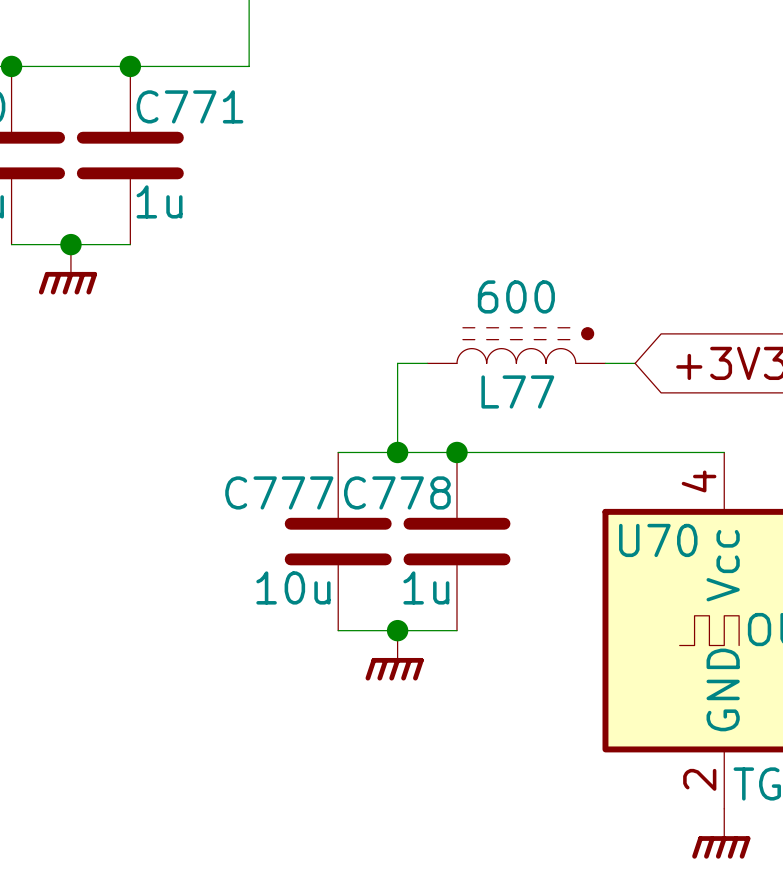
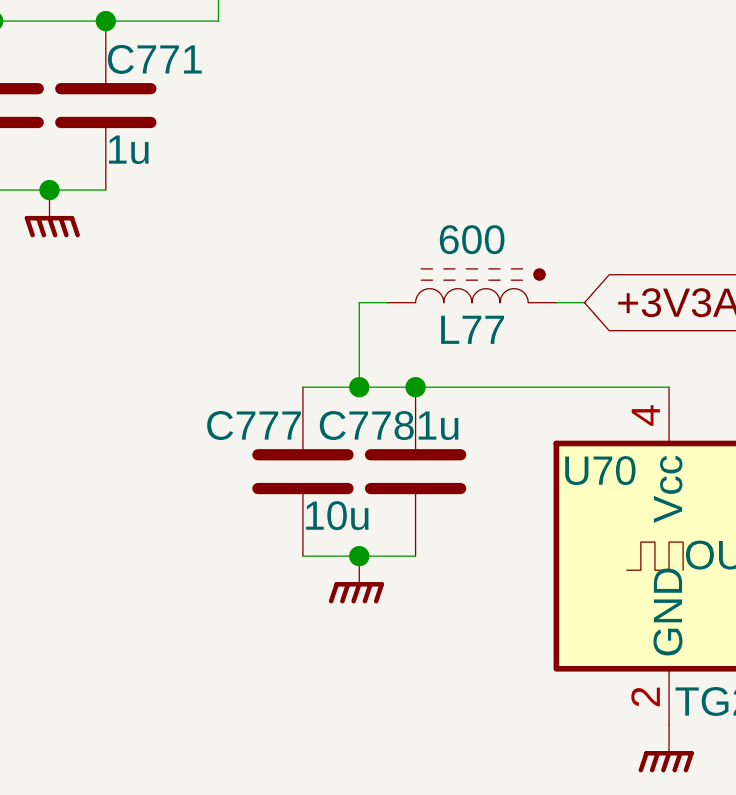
power symbol flip: as is (67, 269) -> left-right (52, 213)
C777 value position: 10u (293, 587) -> 10u (337, 515)
C778 value position: 1u (426, 587) -> 1u (438, 425)

